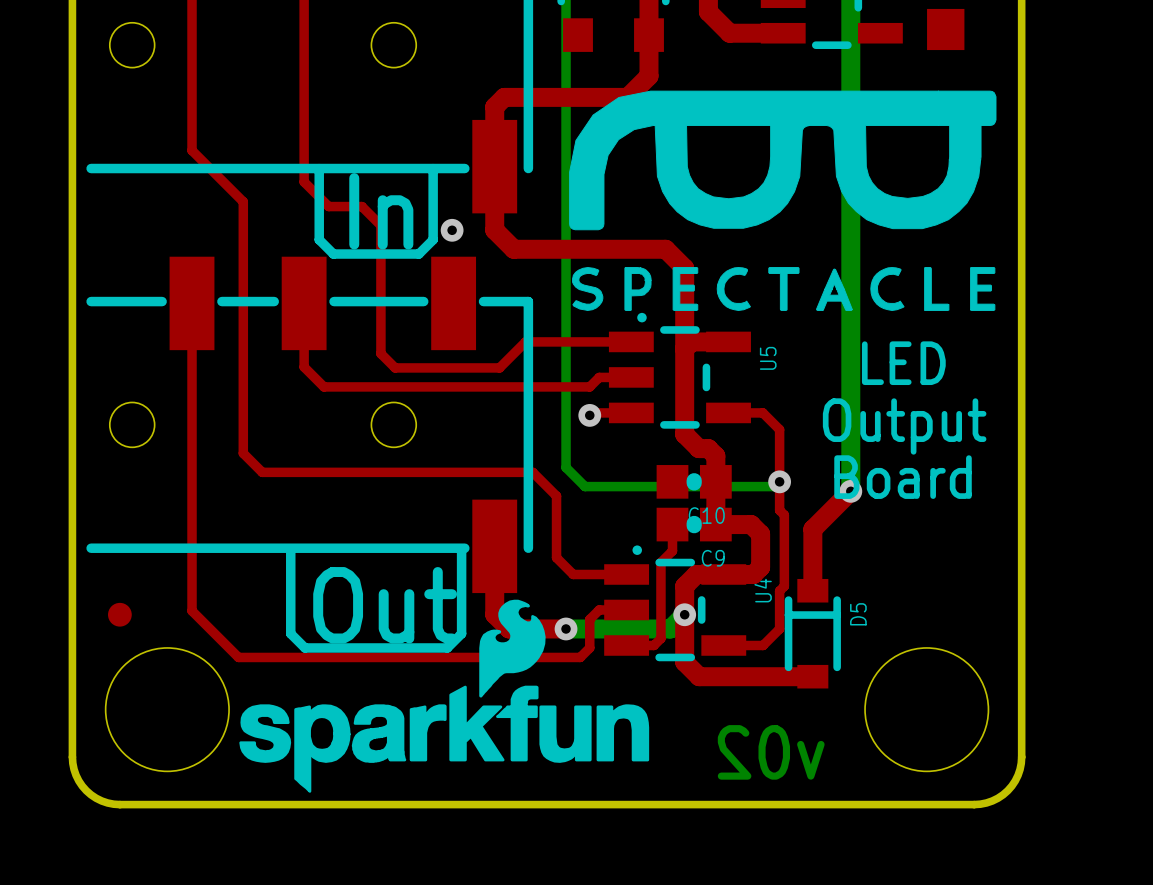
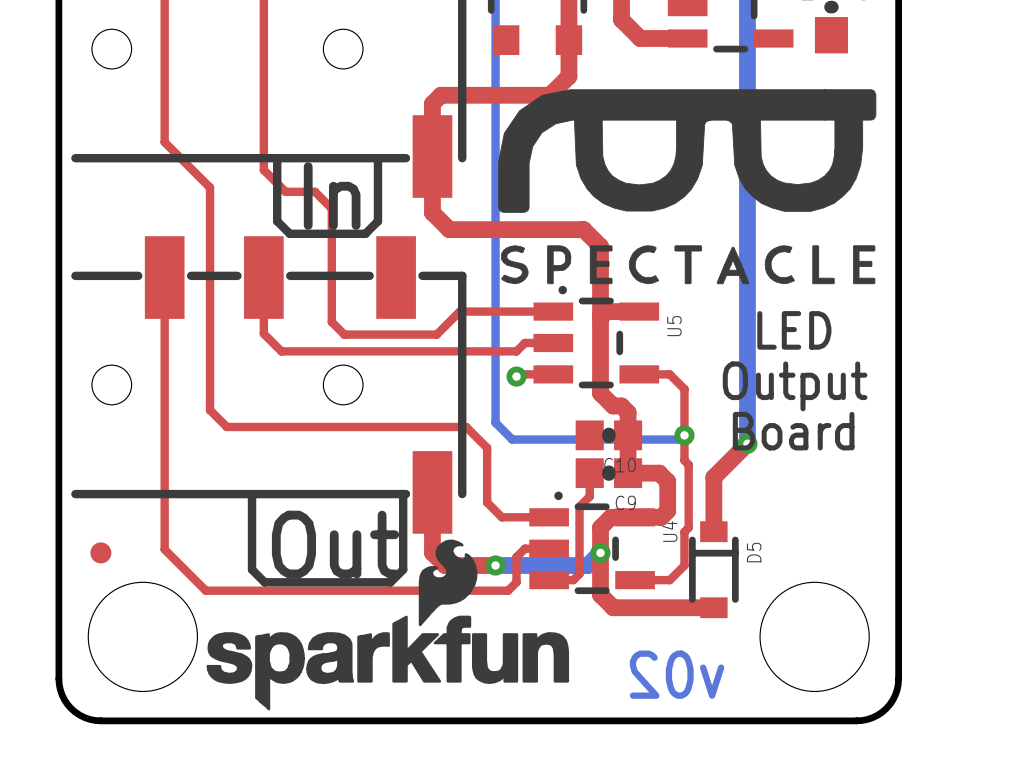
via: (452, 230) -> none

